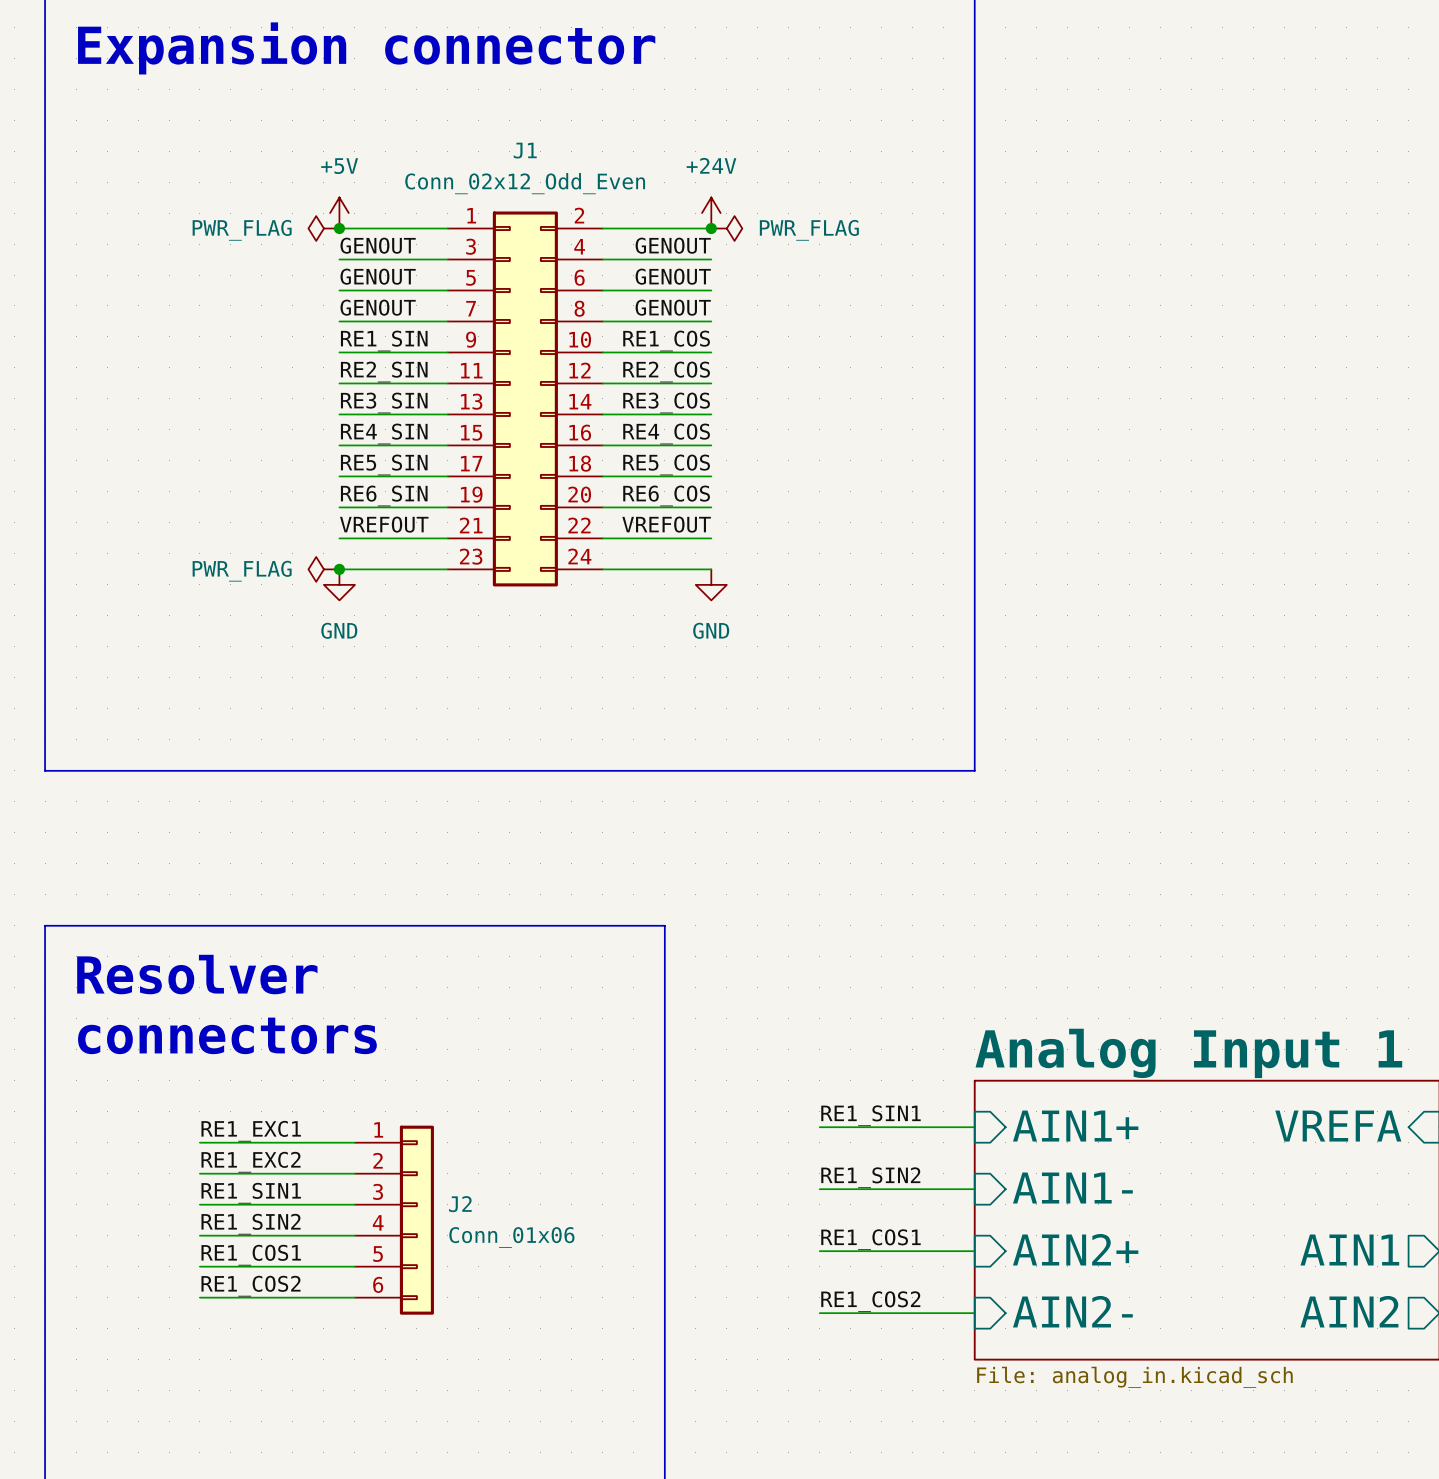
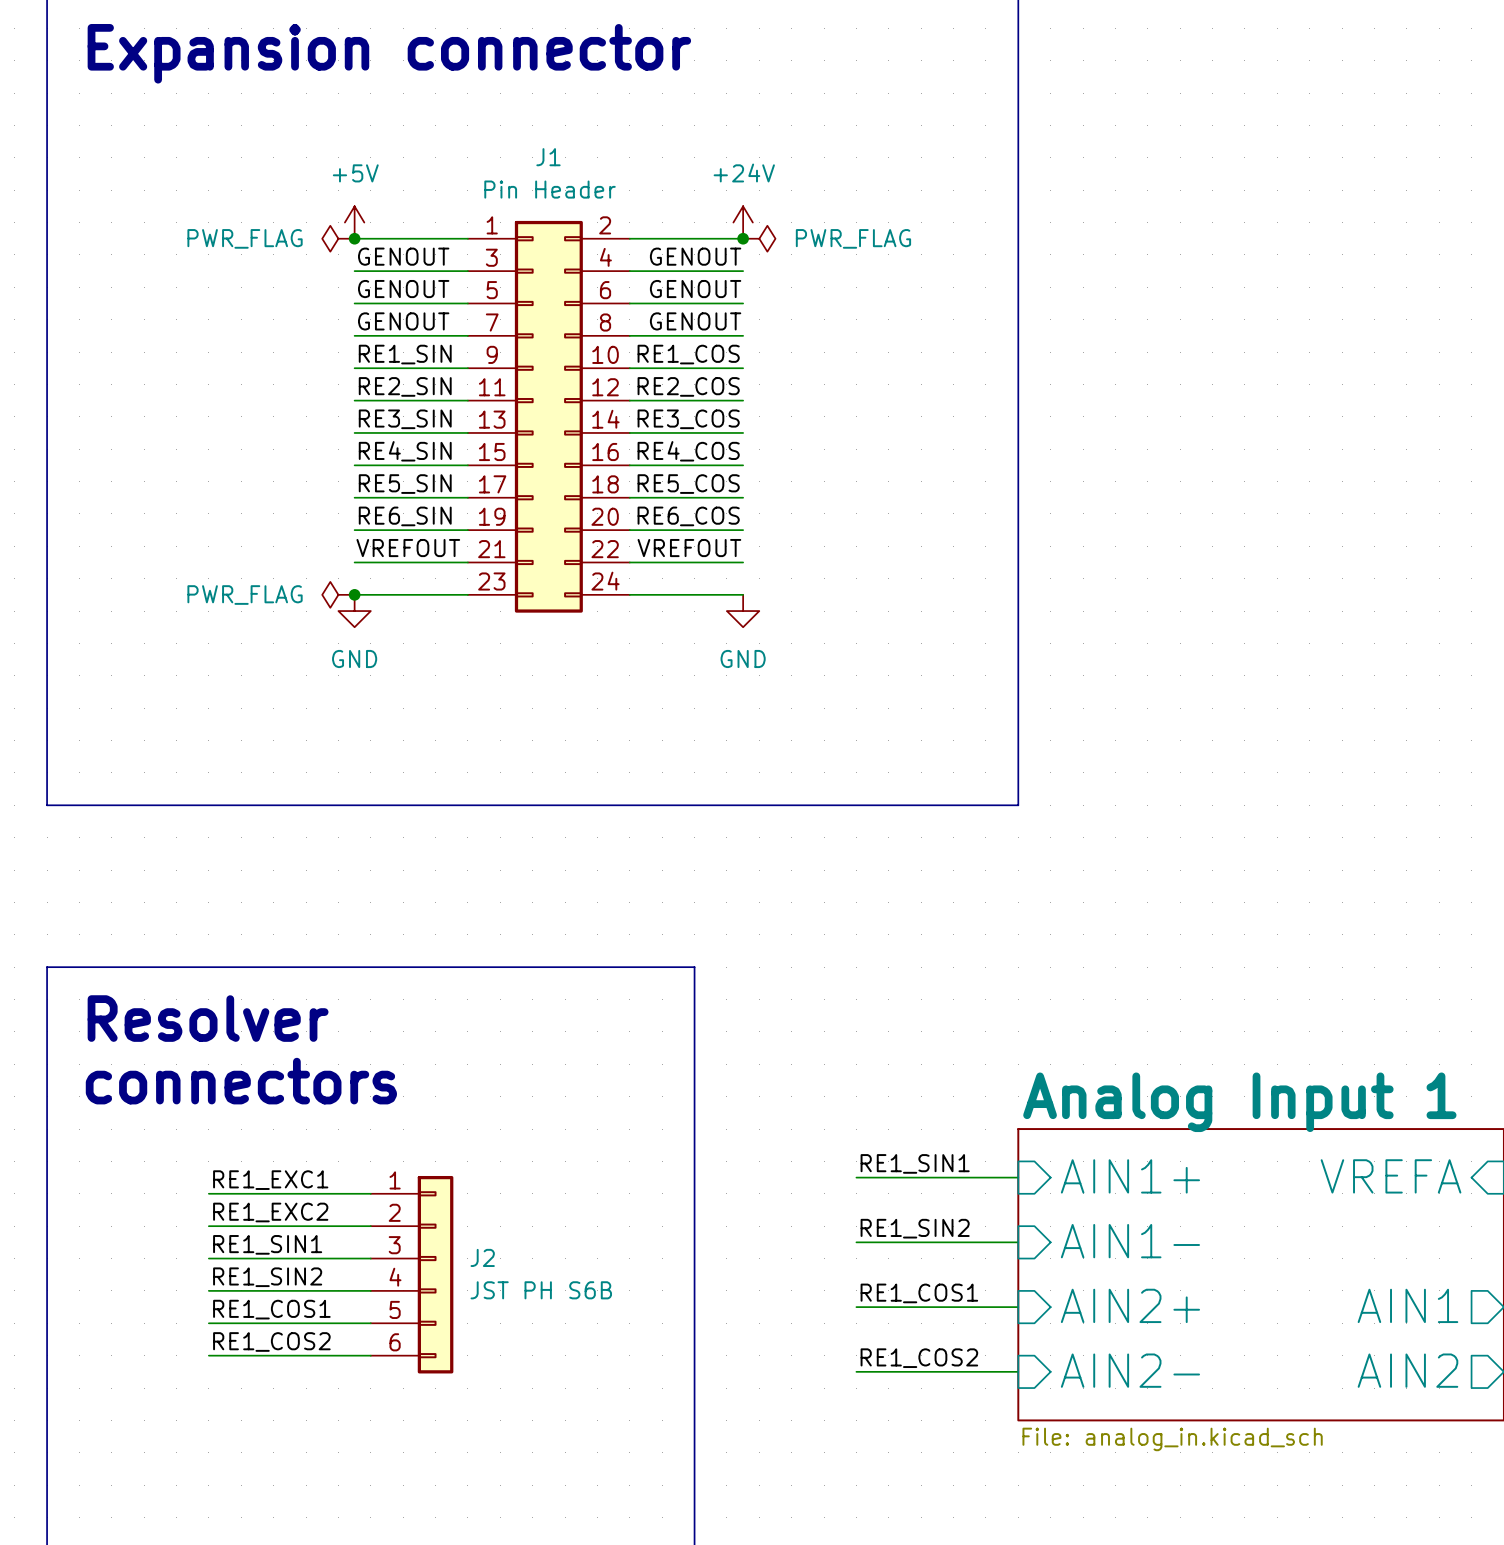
J1 value: Conn_02x12_Odd_Even (525, 183) -> Pin Header (550, 189)
J2 value: Conn_01x06 (511, 1237) -> JST PH S6B (541, 1290)

